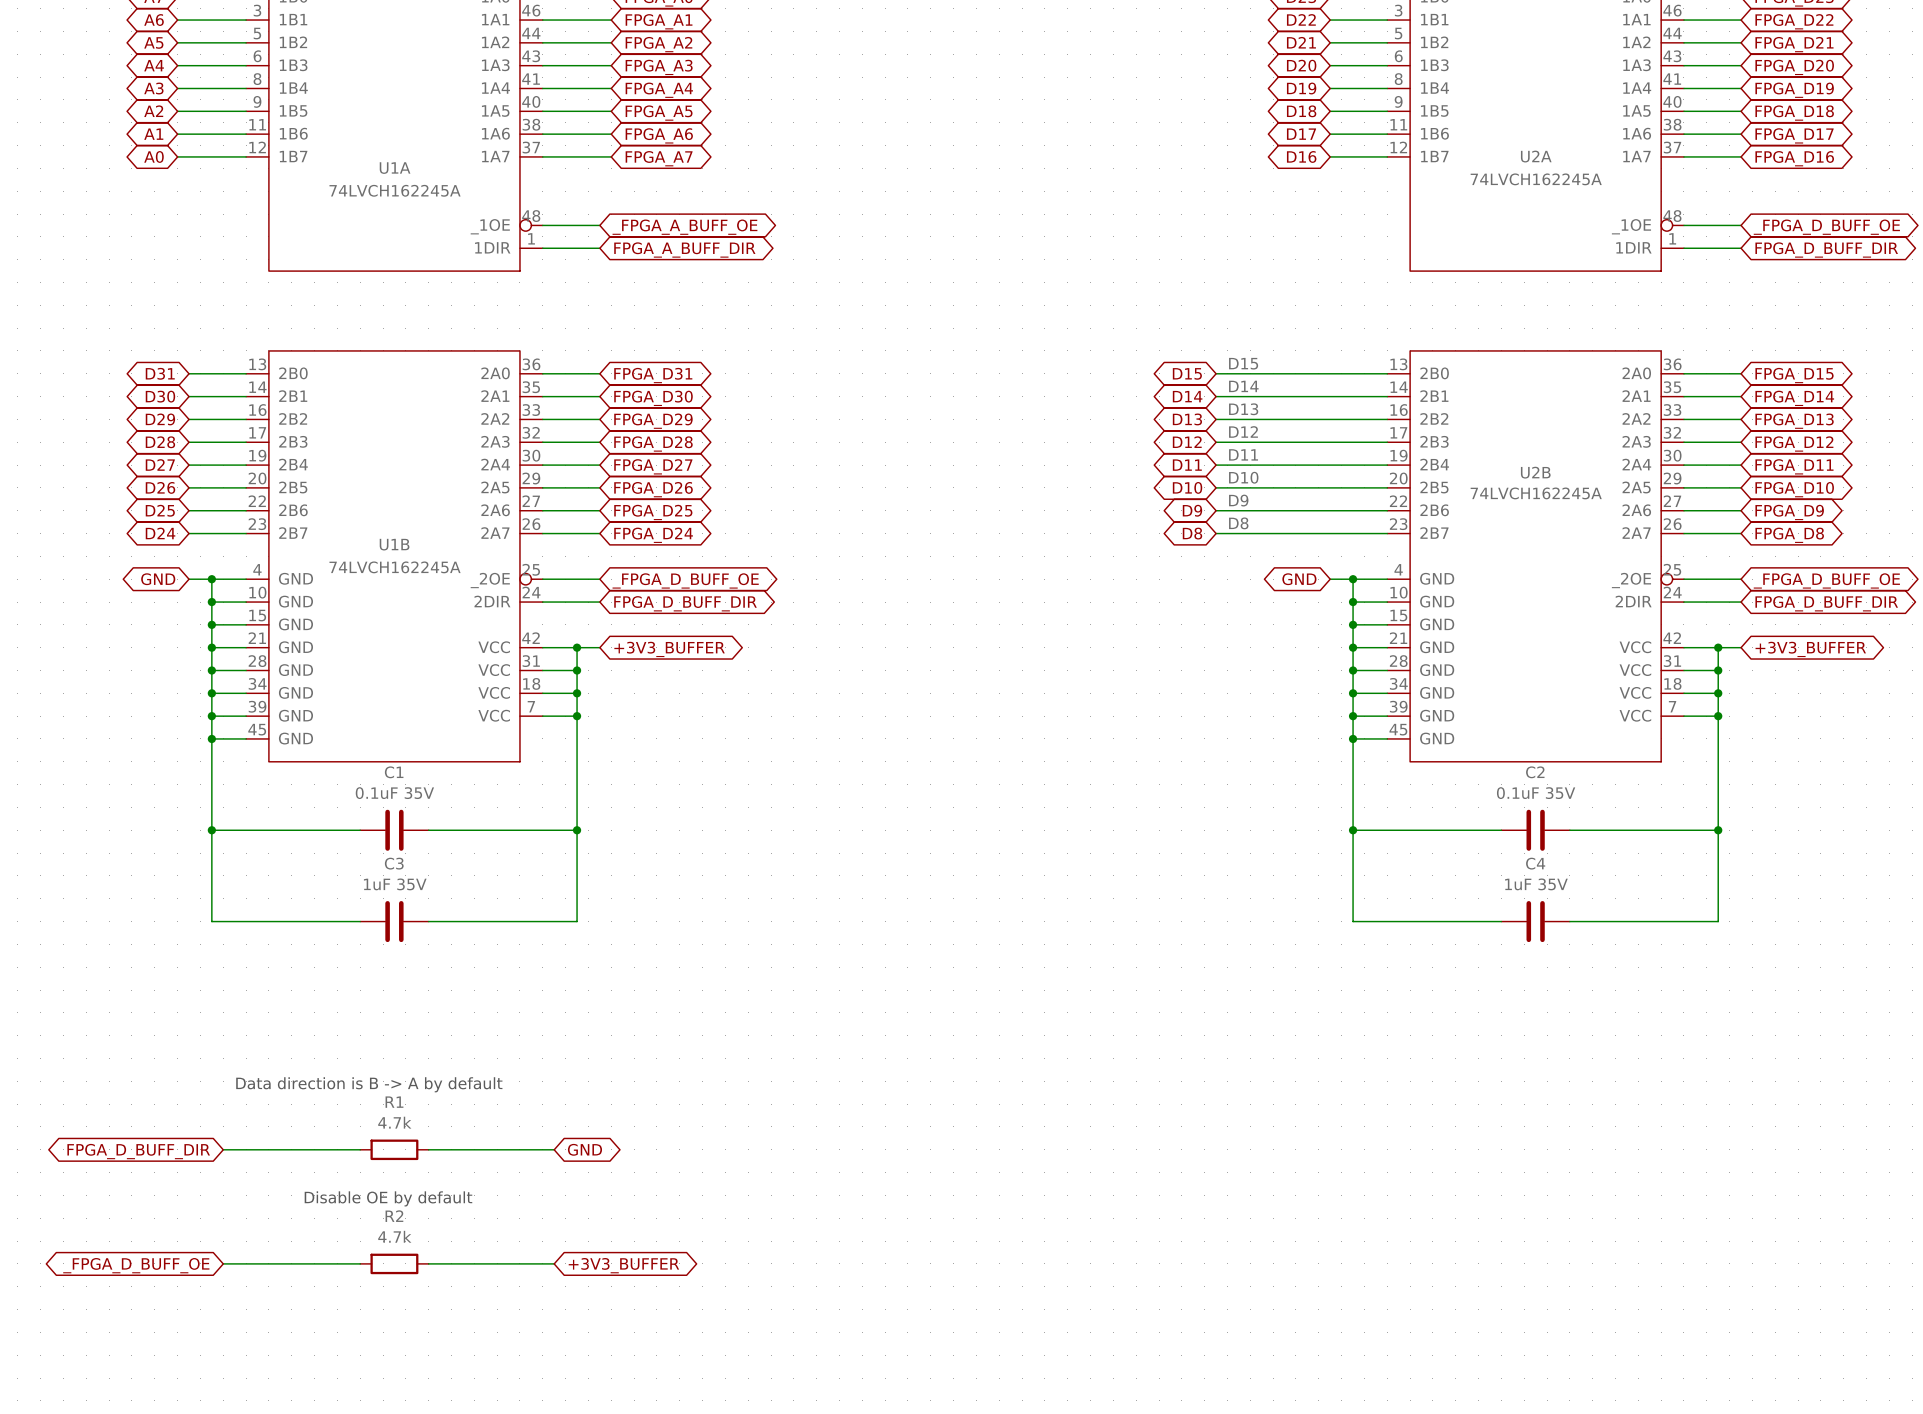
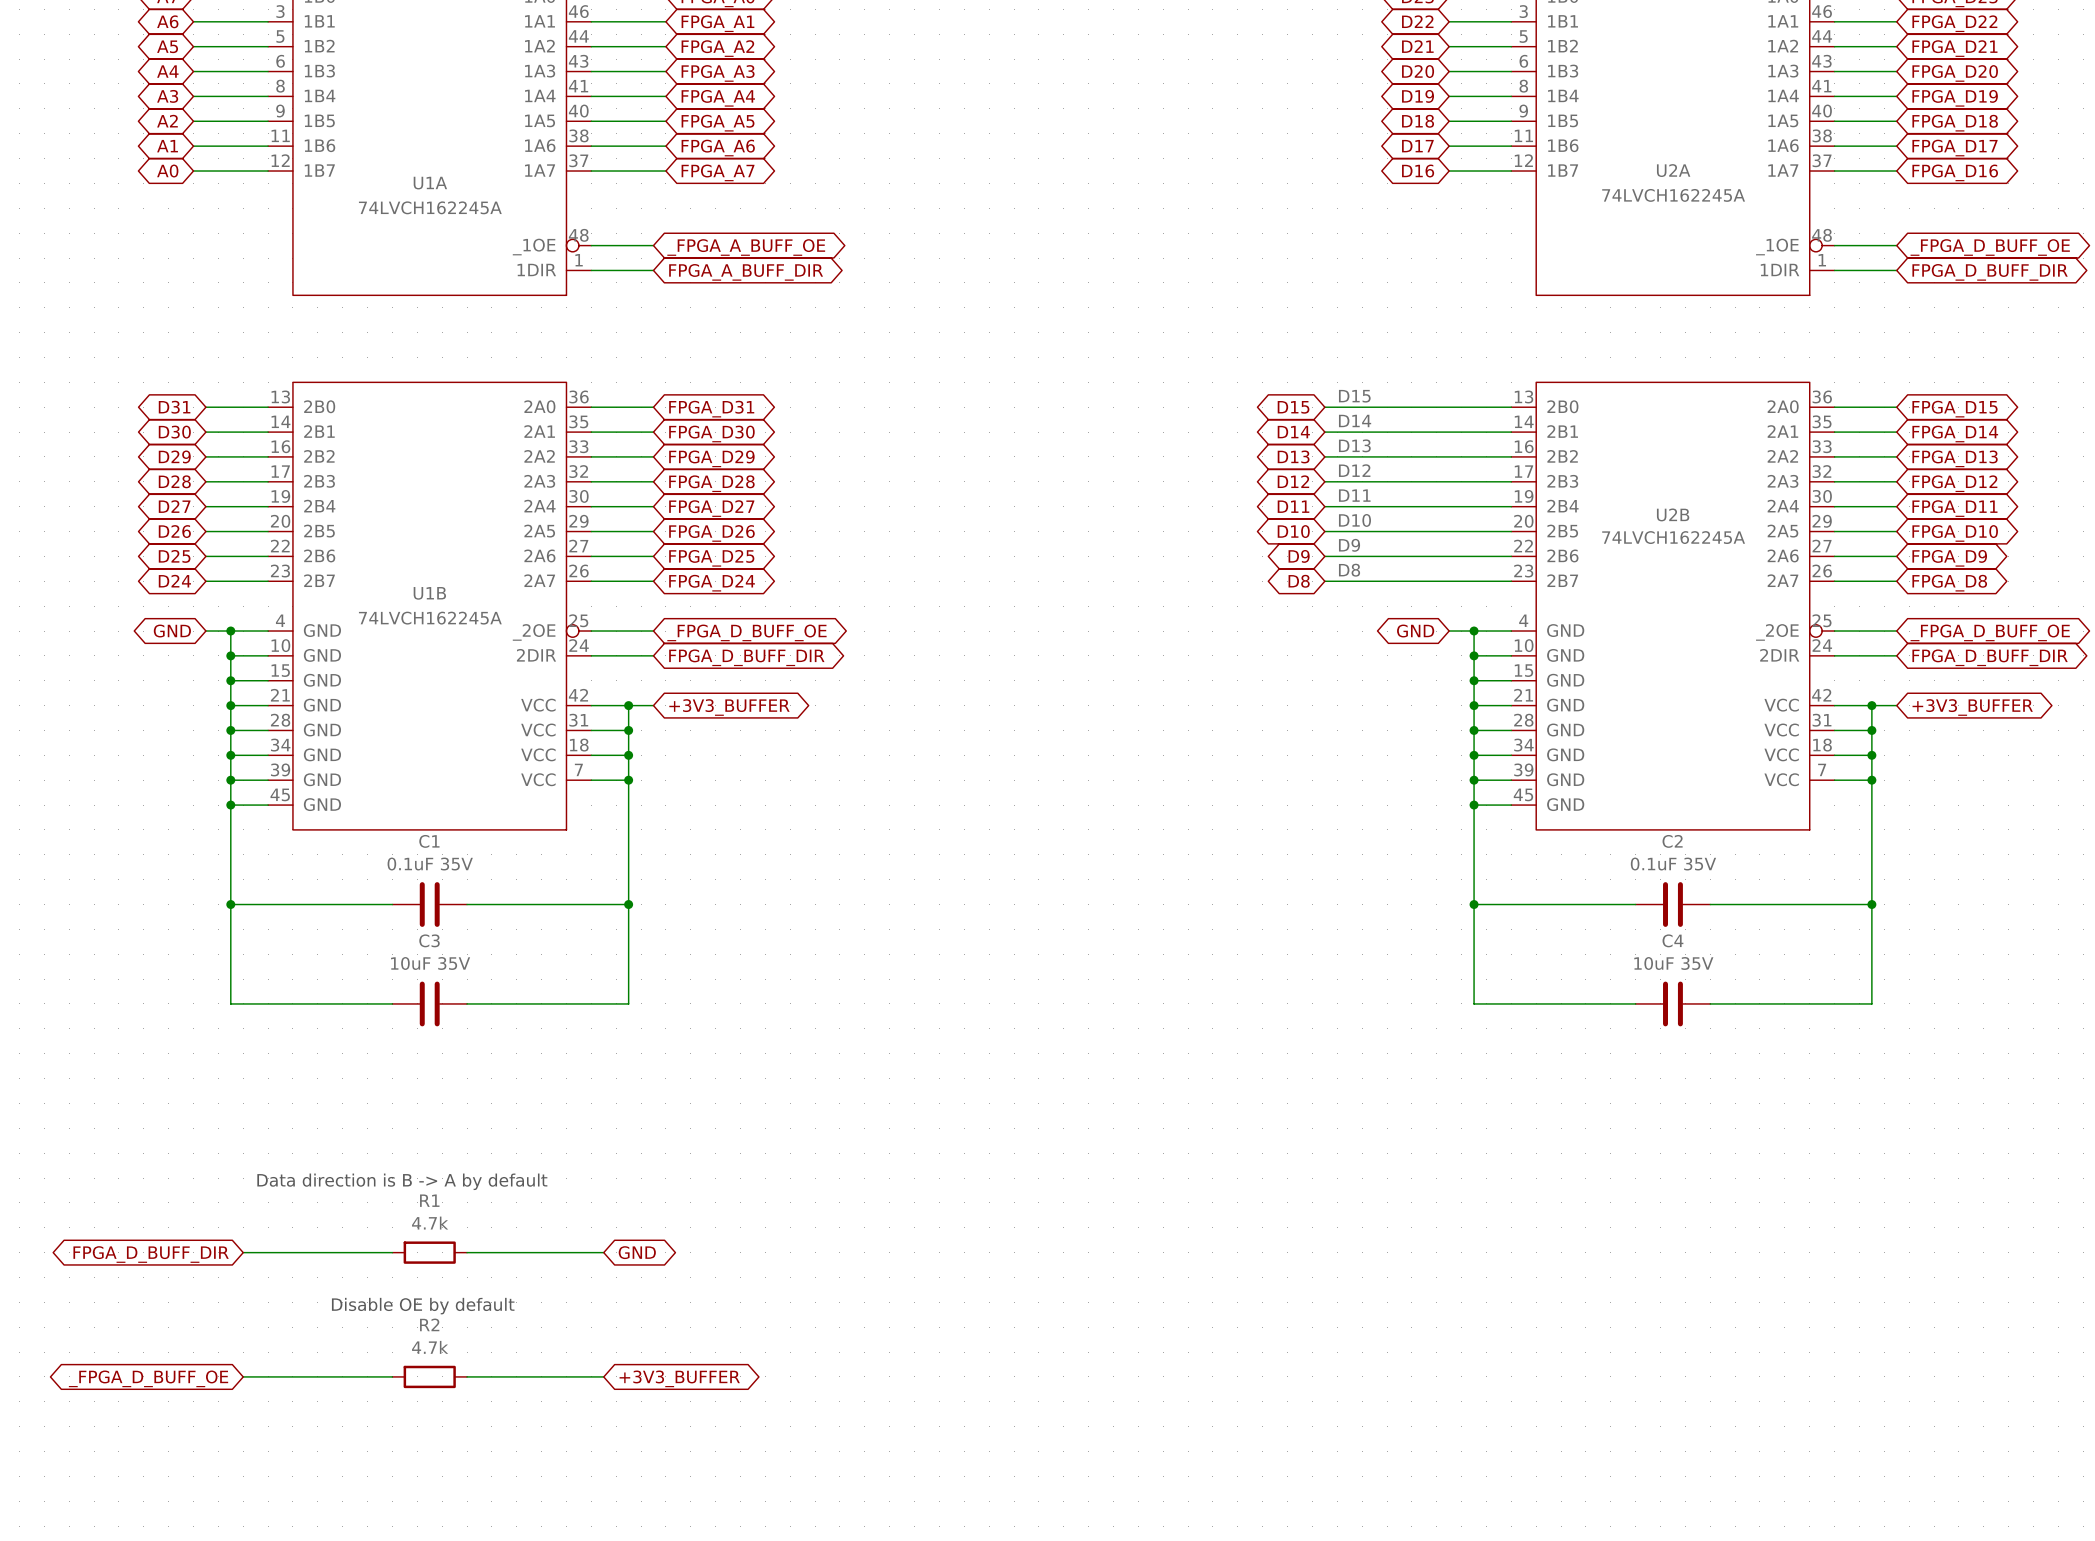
C3 value: 1uF 35V (395, 884) -> 10uF 35V (430, 963)
C4 value: 1uF 35V (1536, 884) -> 10uF 35V (1673, 963)

